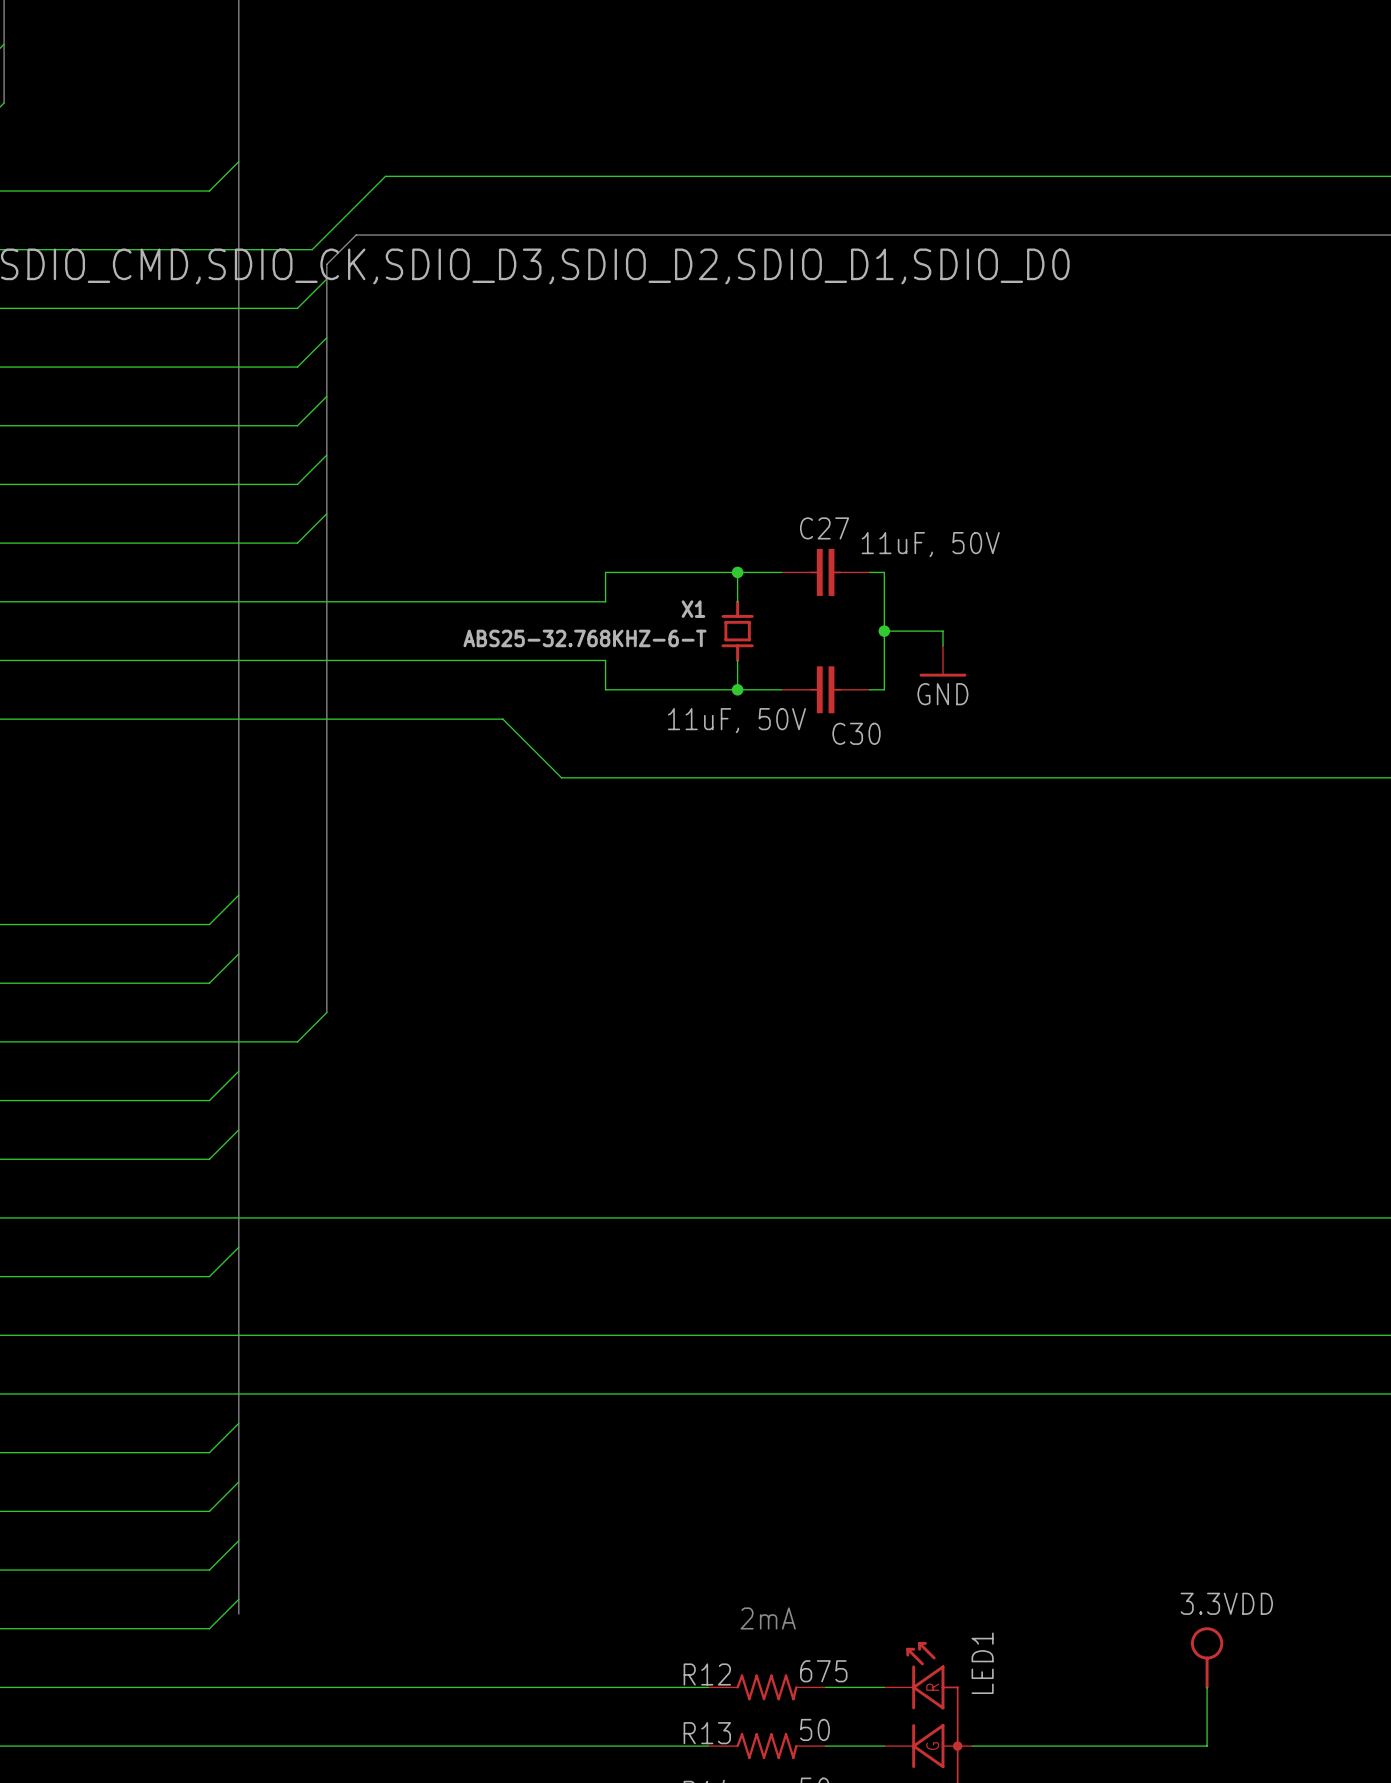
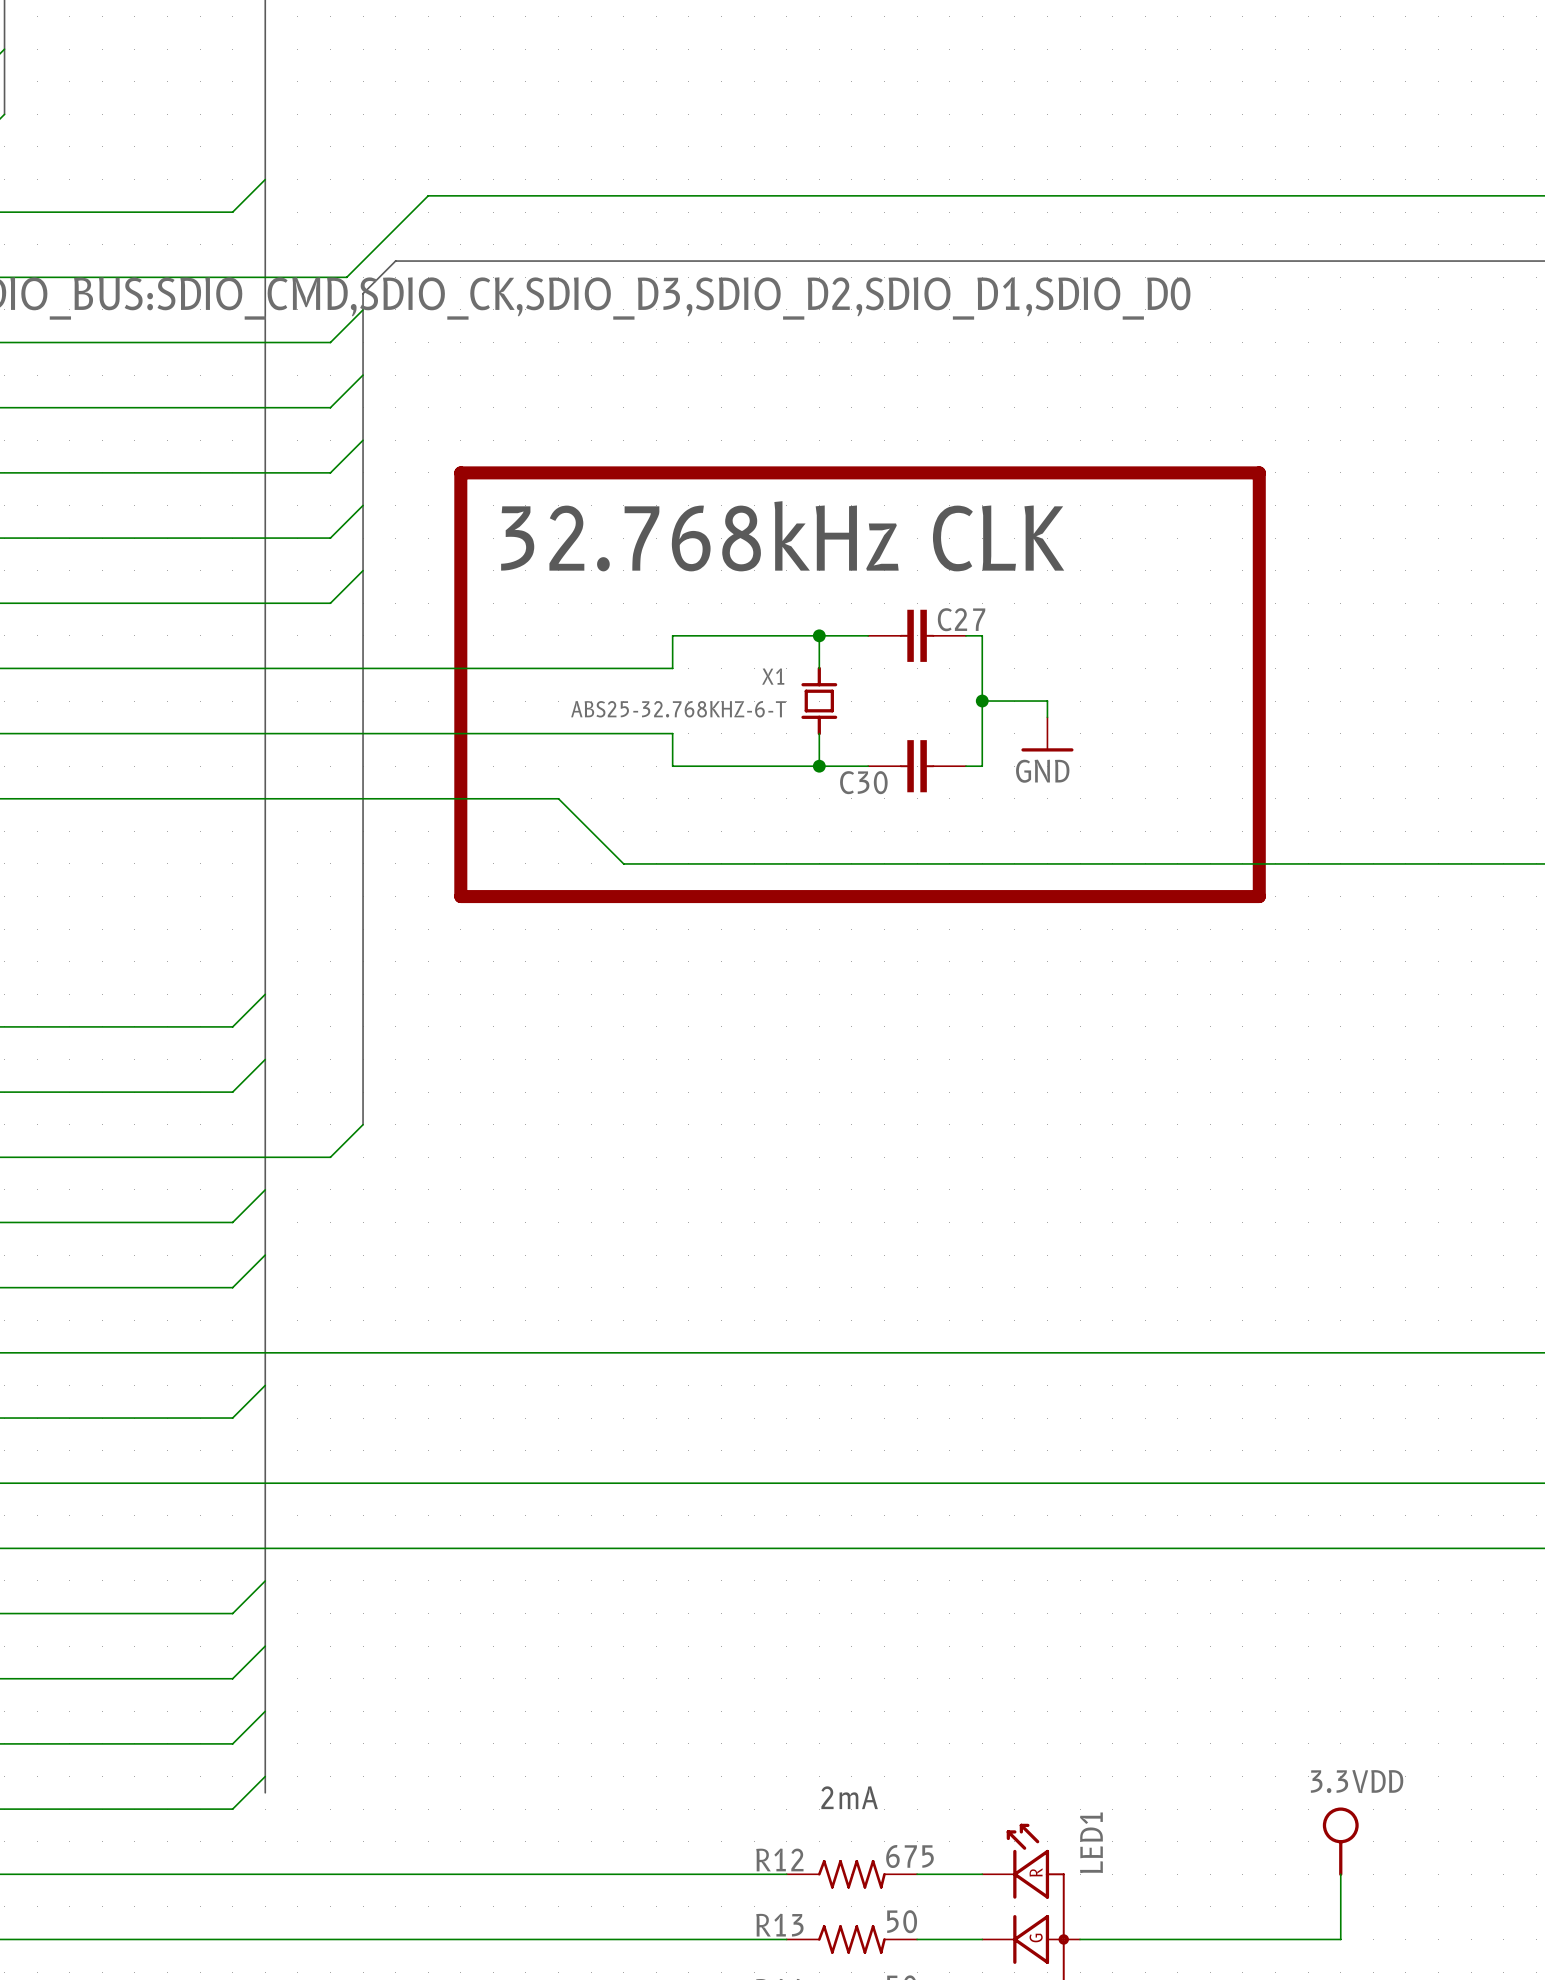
line: none -> (460, 472) (460, 896) (1259, 896) (1259, 472) (460, 472)
text: none -> 32.768kHz CLK (782, 536)
C27 name position: C27 (824, 528) -> C27 (961, 619)
C27 value: 11uF, 50V (930, 544) -> none
C30 value: 11uF, 50V (736, 720) -> none
C30 name position: C30 (856, 733) -> C30 (863, 782)

